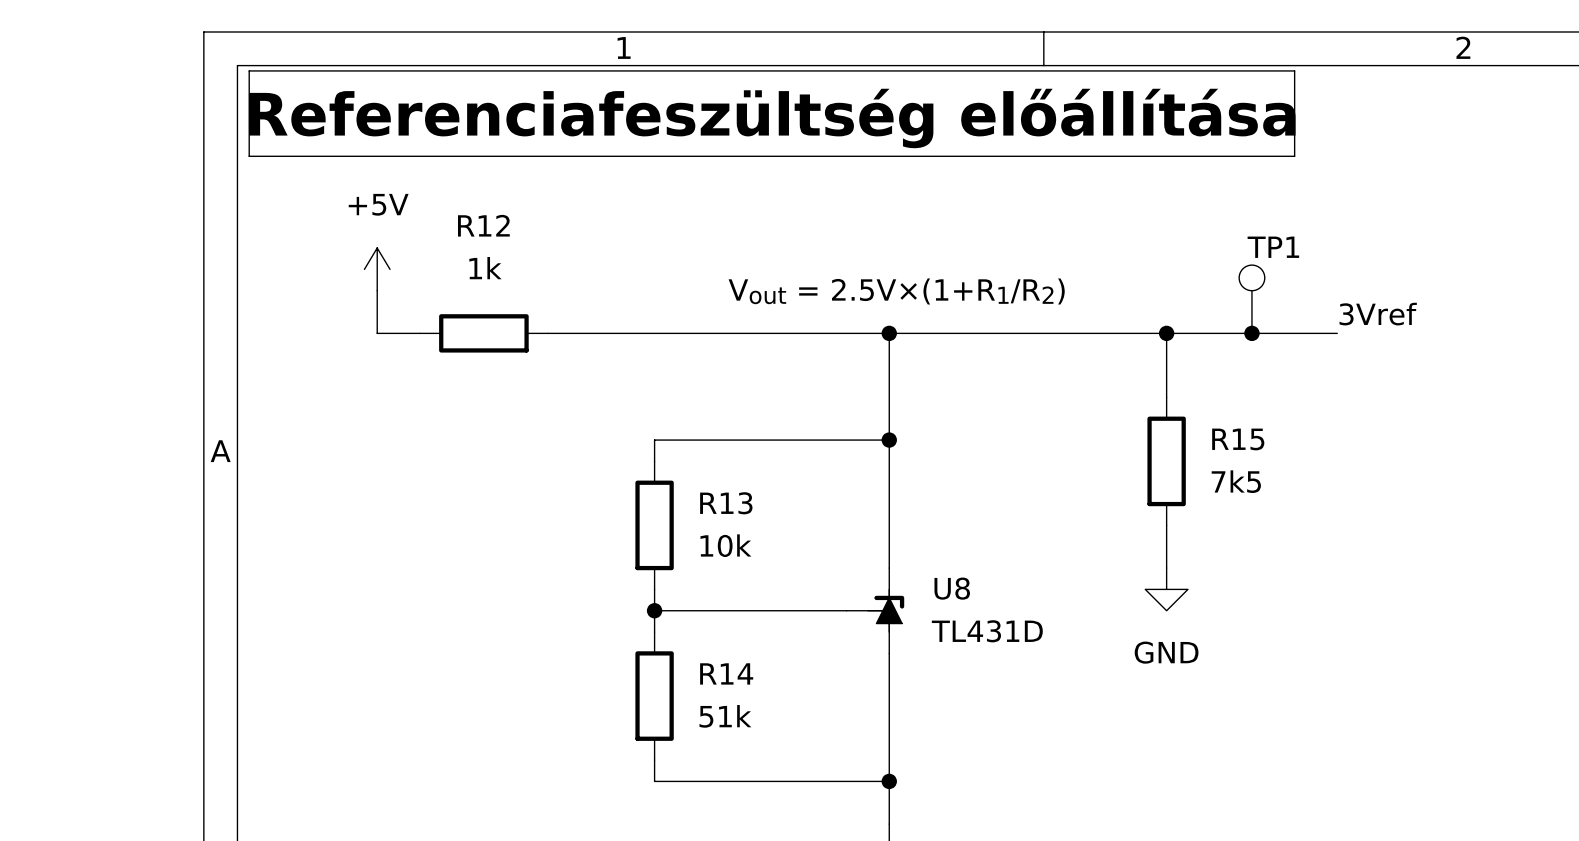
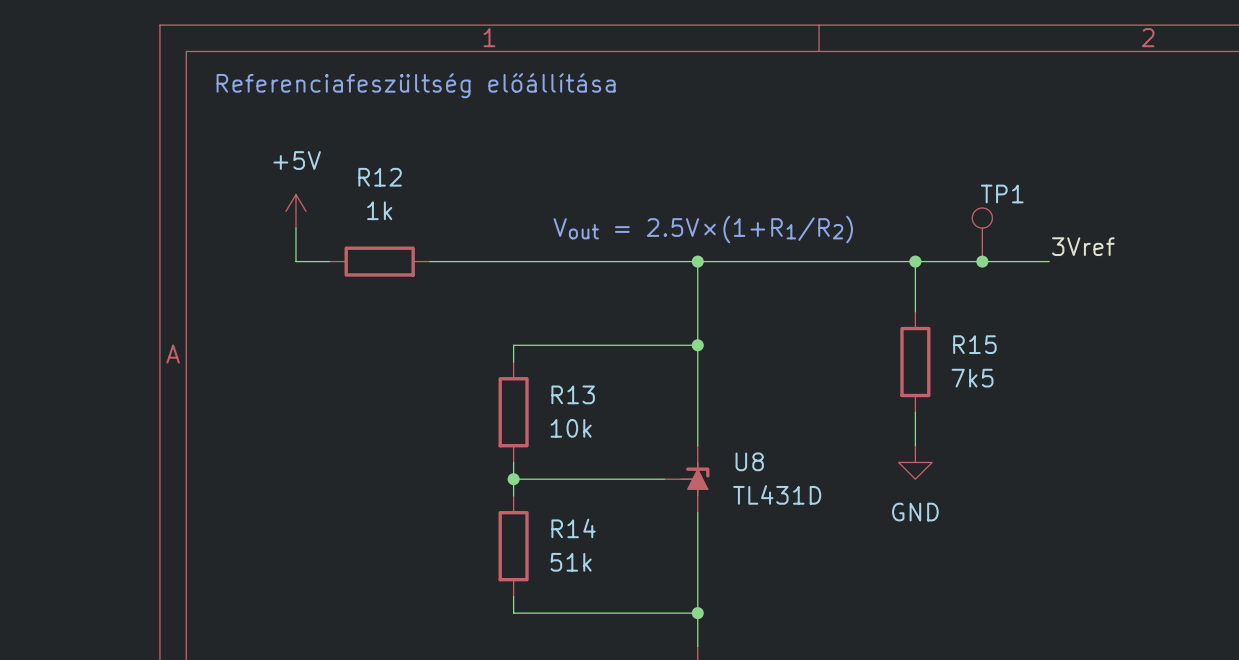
line: (249, 70) (1294, 70) (1294, 156) (249, 156) (249, 70) -> none
text: none -> Referenciafeszültség előállítása (416, 85)
text: Referenciafeszültség előállítása (772, 118) -> none

